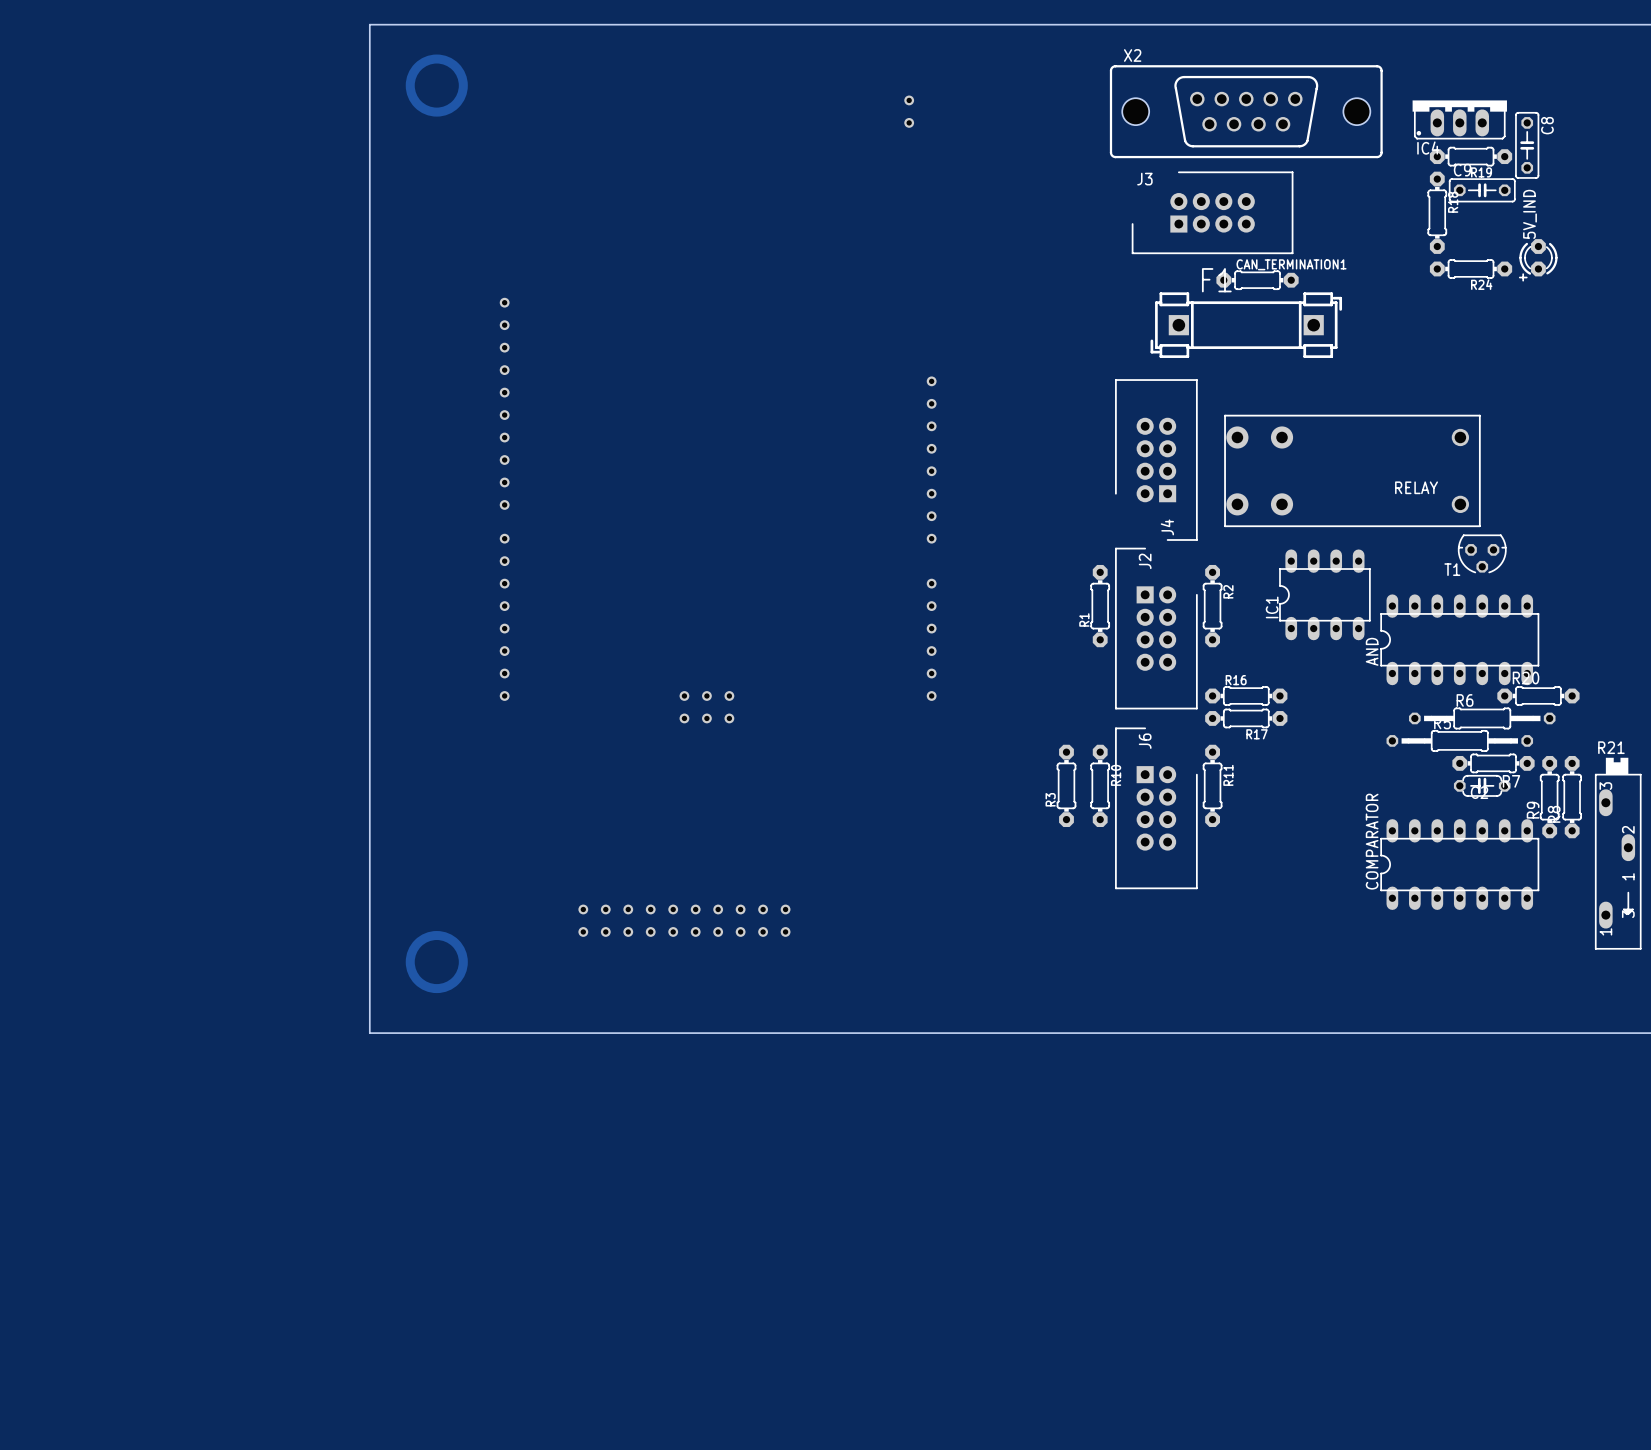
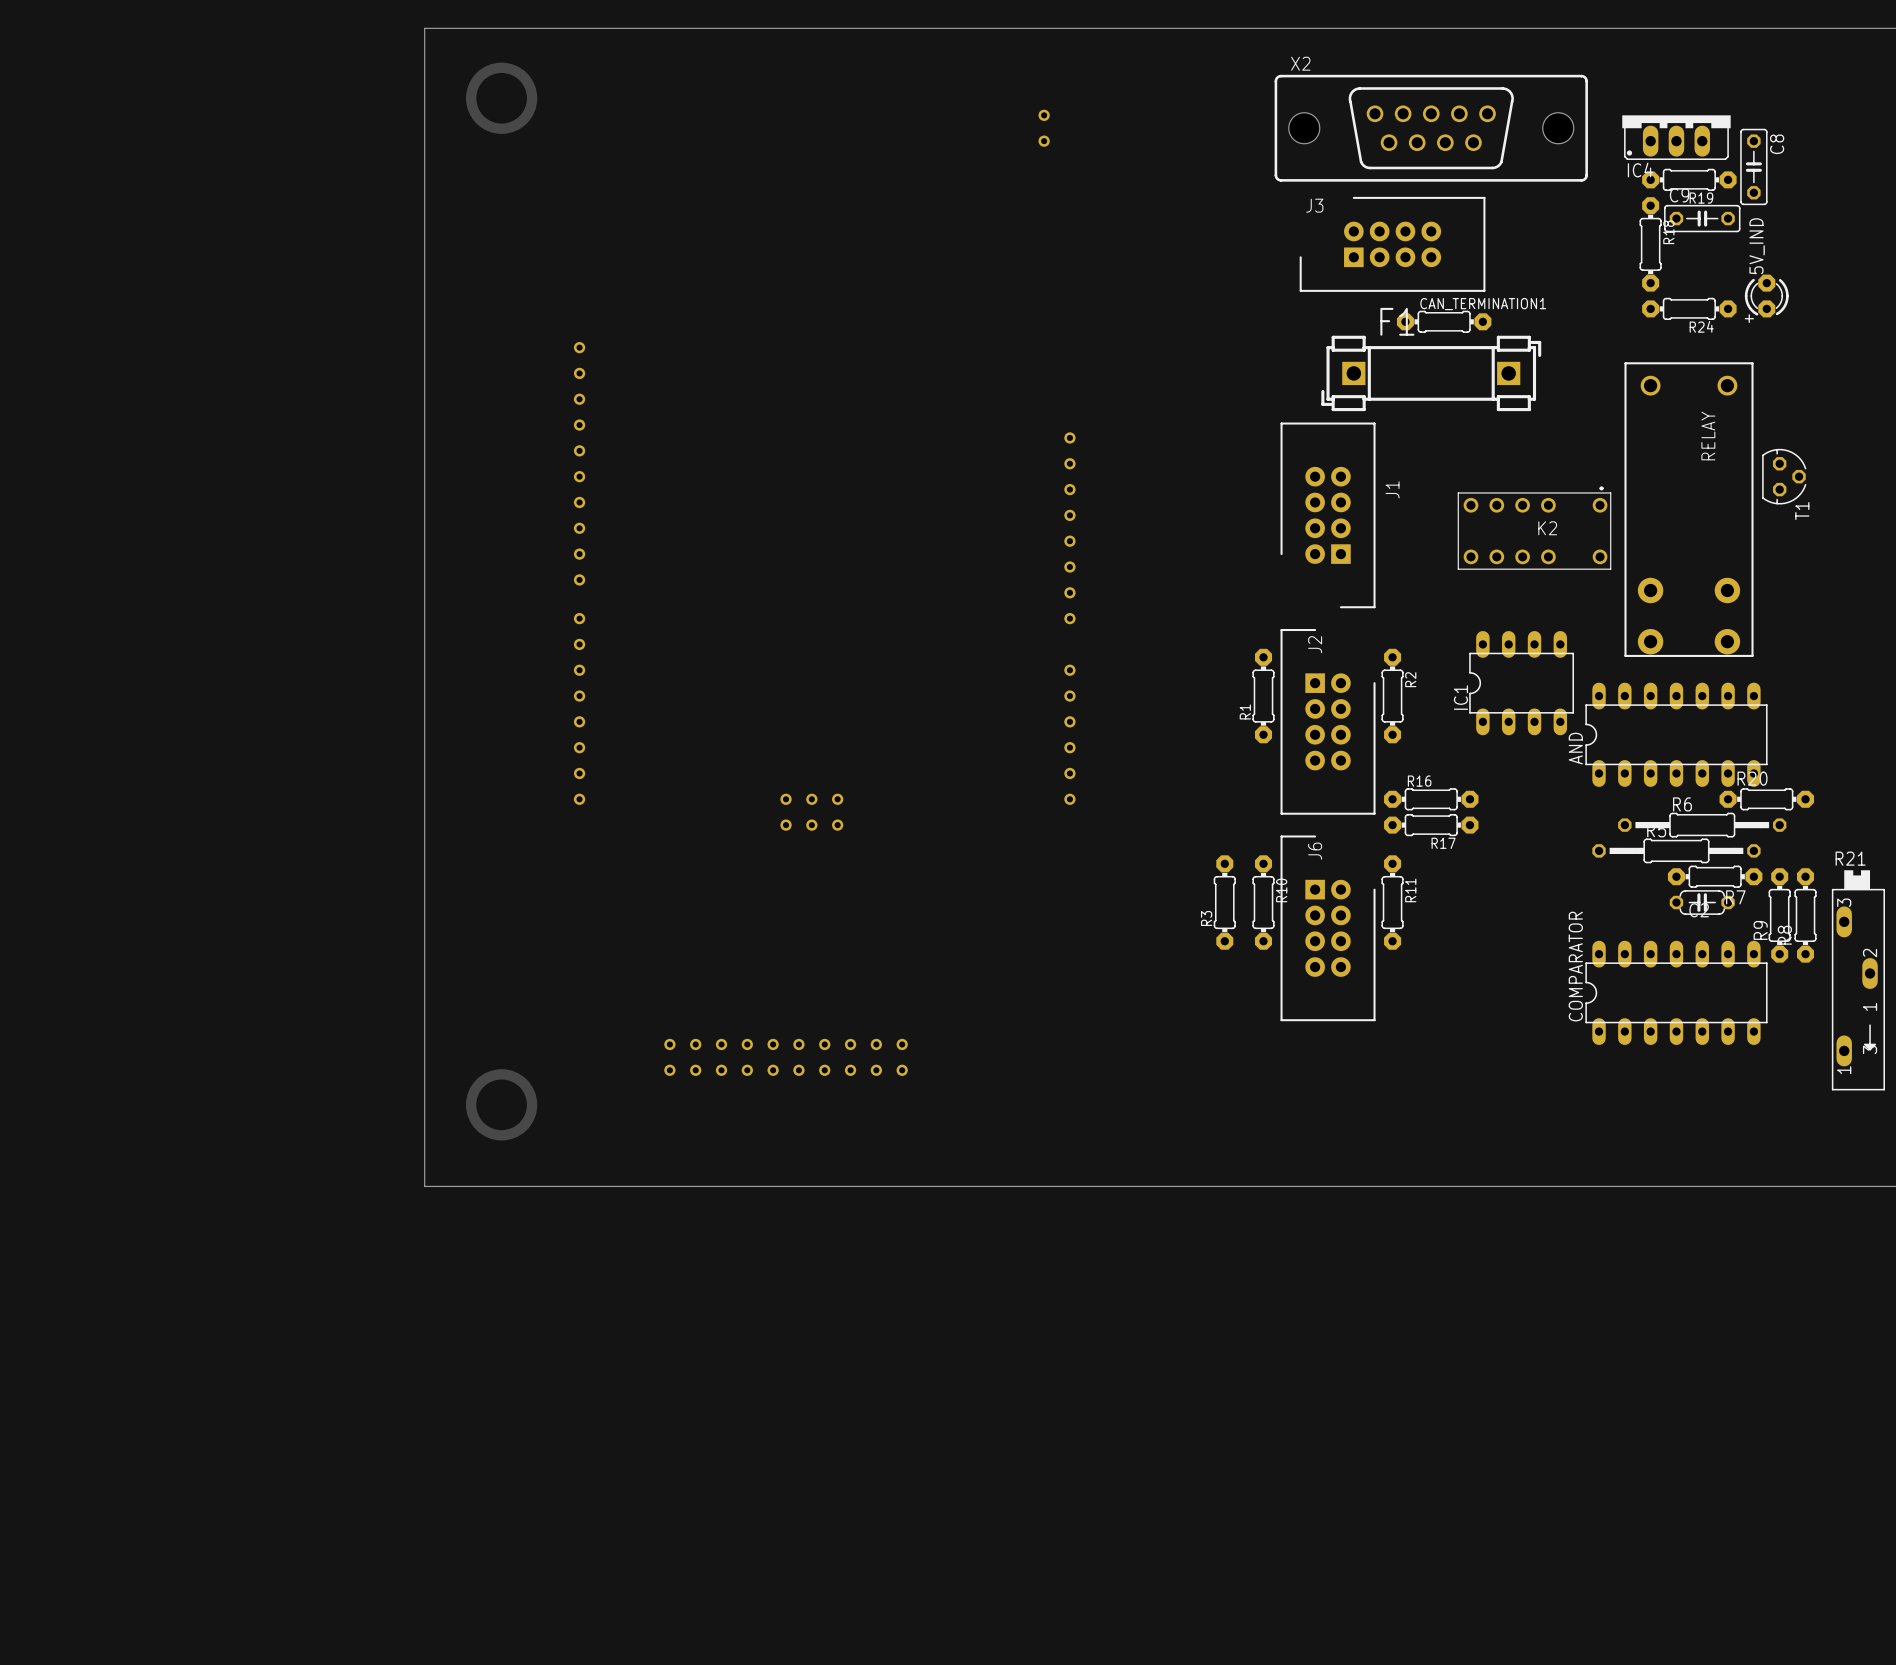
J1: none -> (1328, 515)
K2: none -> (1534, 528)
J4: (1156, 460) -> none
RELAY rotation: 0° (1352, 470) -> 90° counterclockwise (1689, 509)
T1 rotation: 0° (1482, 553) -> 90° counterclockwise (1784, 476)
T1 position: (1482, 553) -> (1784, 476)

